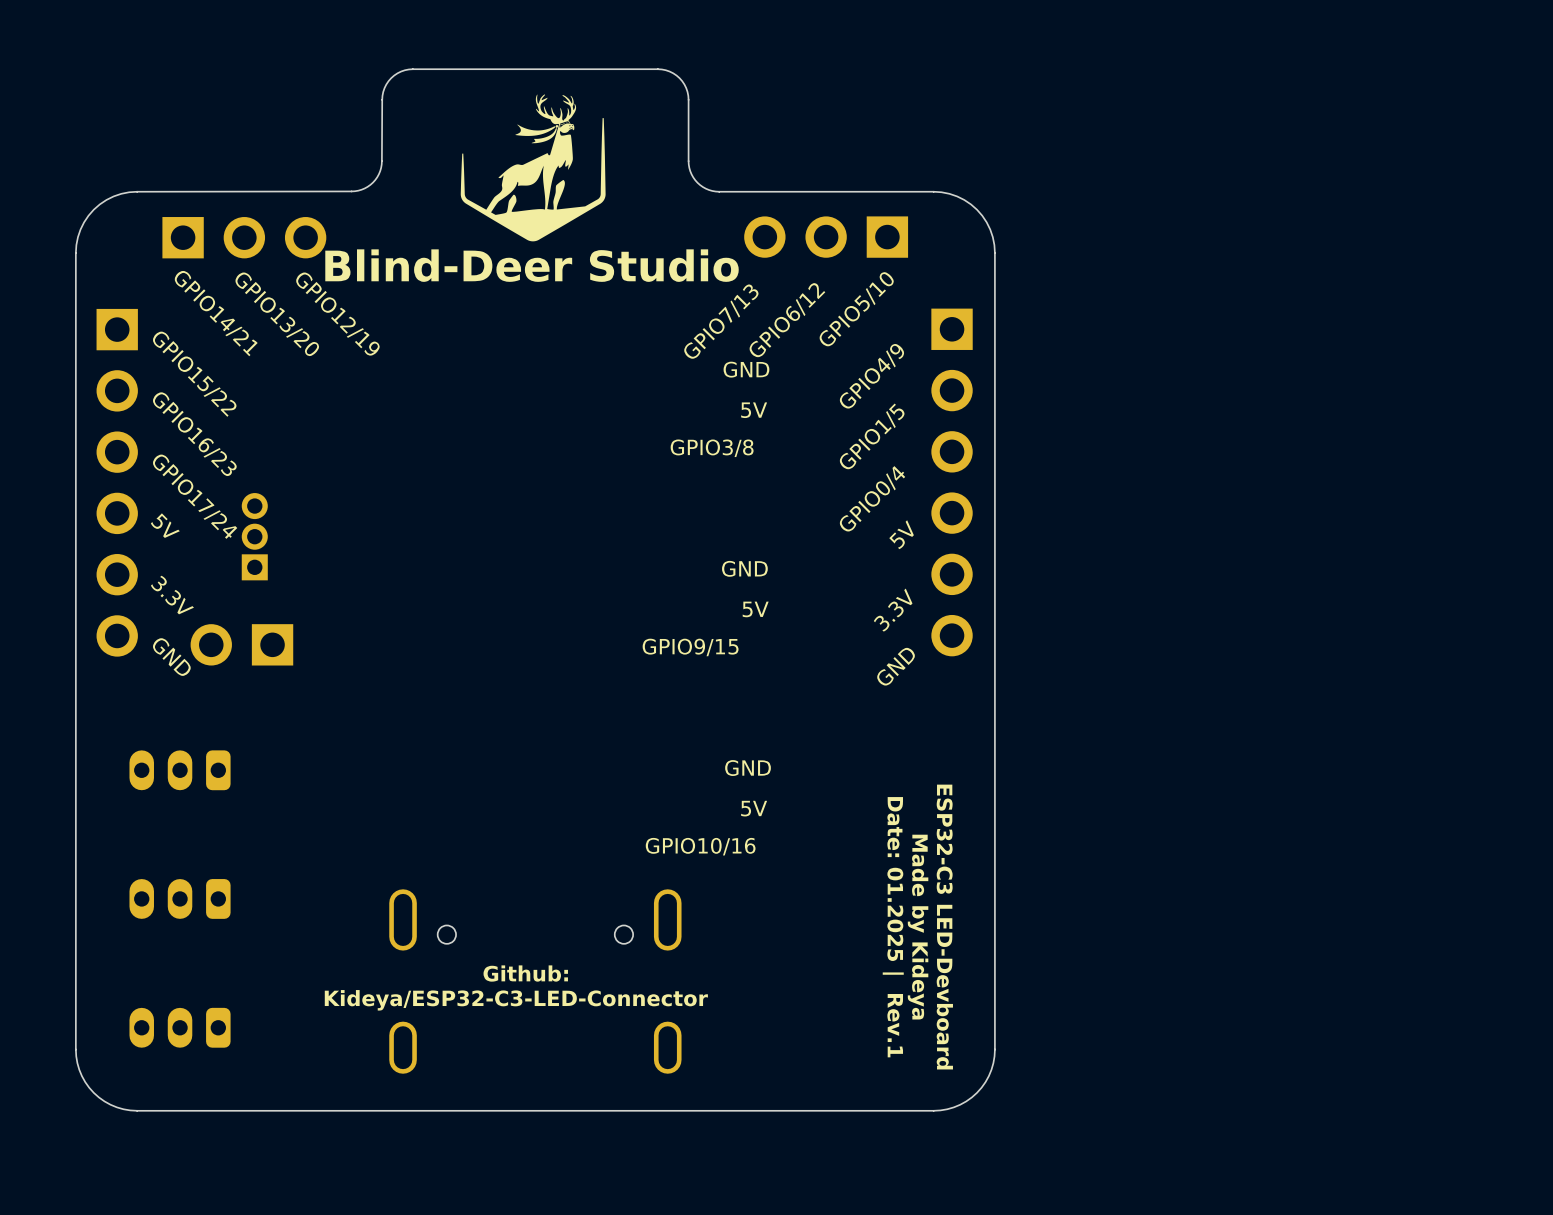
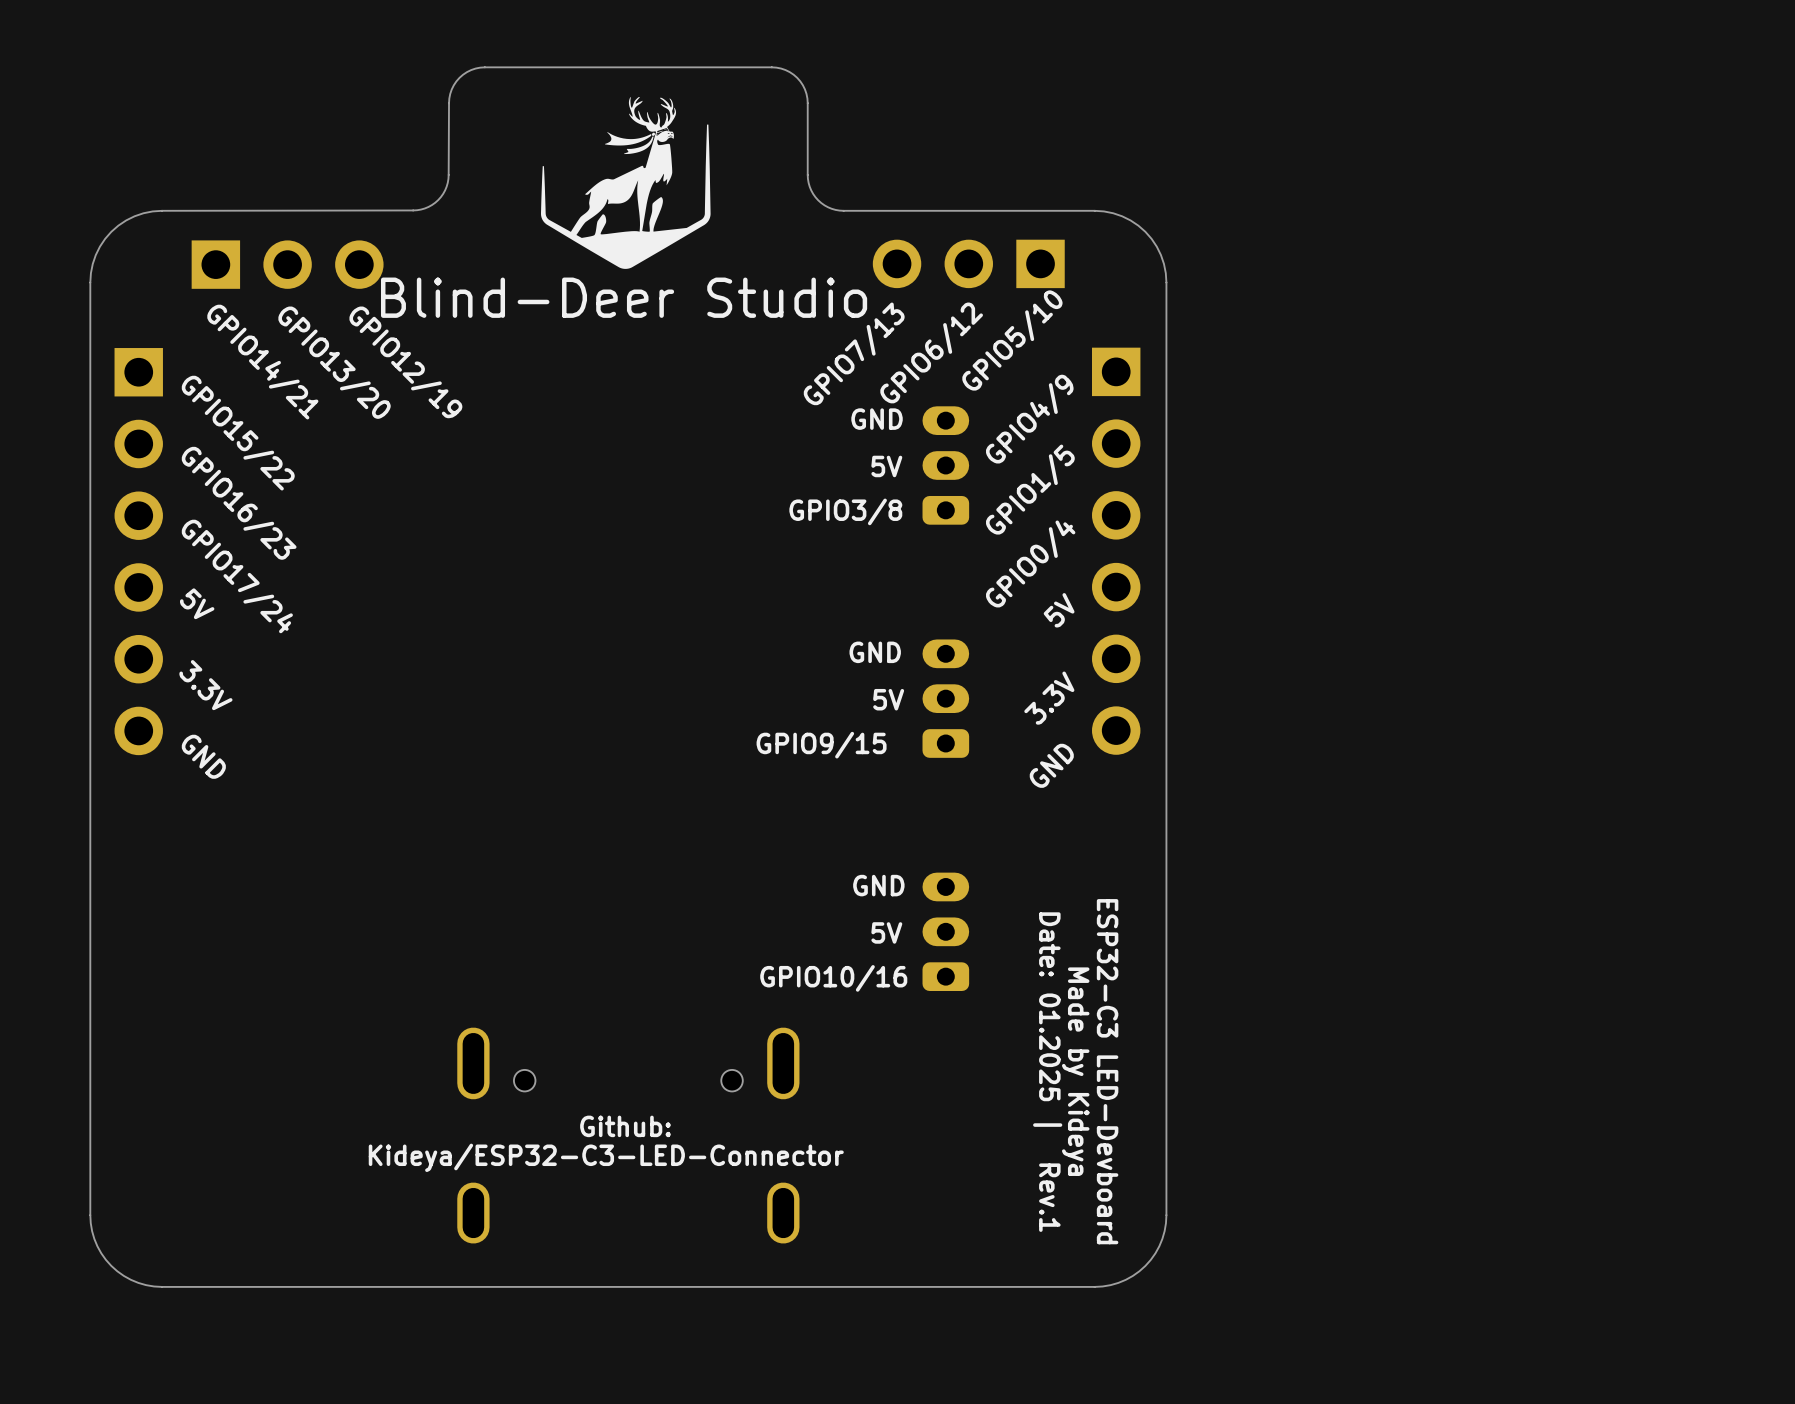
part: none -> (945, 465)
part: (254, 536) -> none
part: none -> (945, 698)
part: (241, 644) -> none
part: (180, 770) -> none
part: none -> (945, 931)
part: (180, 898) -> none
part: (180, 1027) -> none

